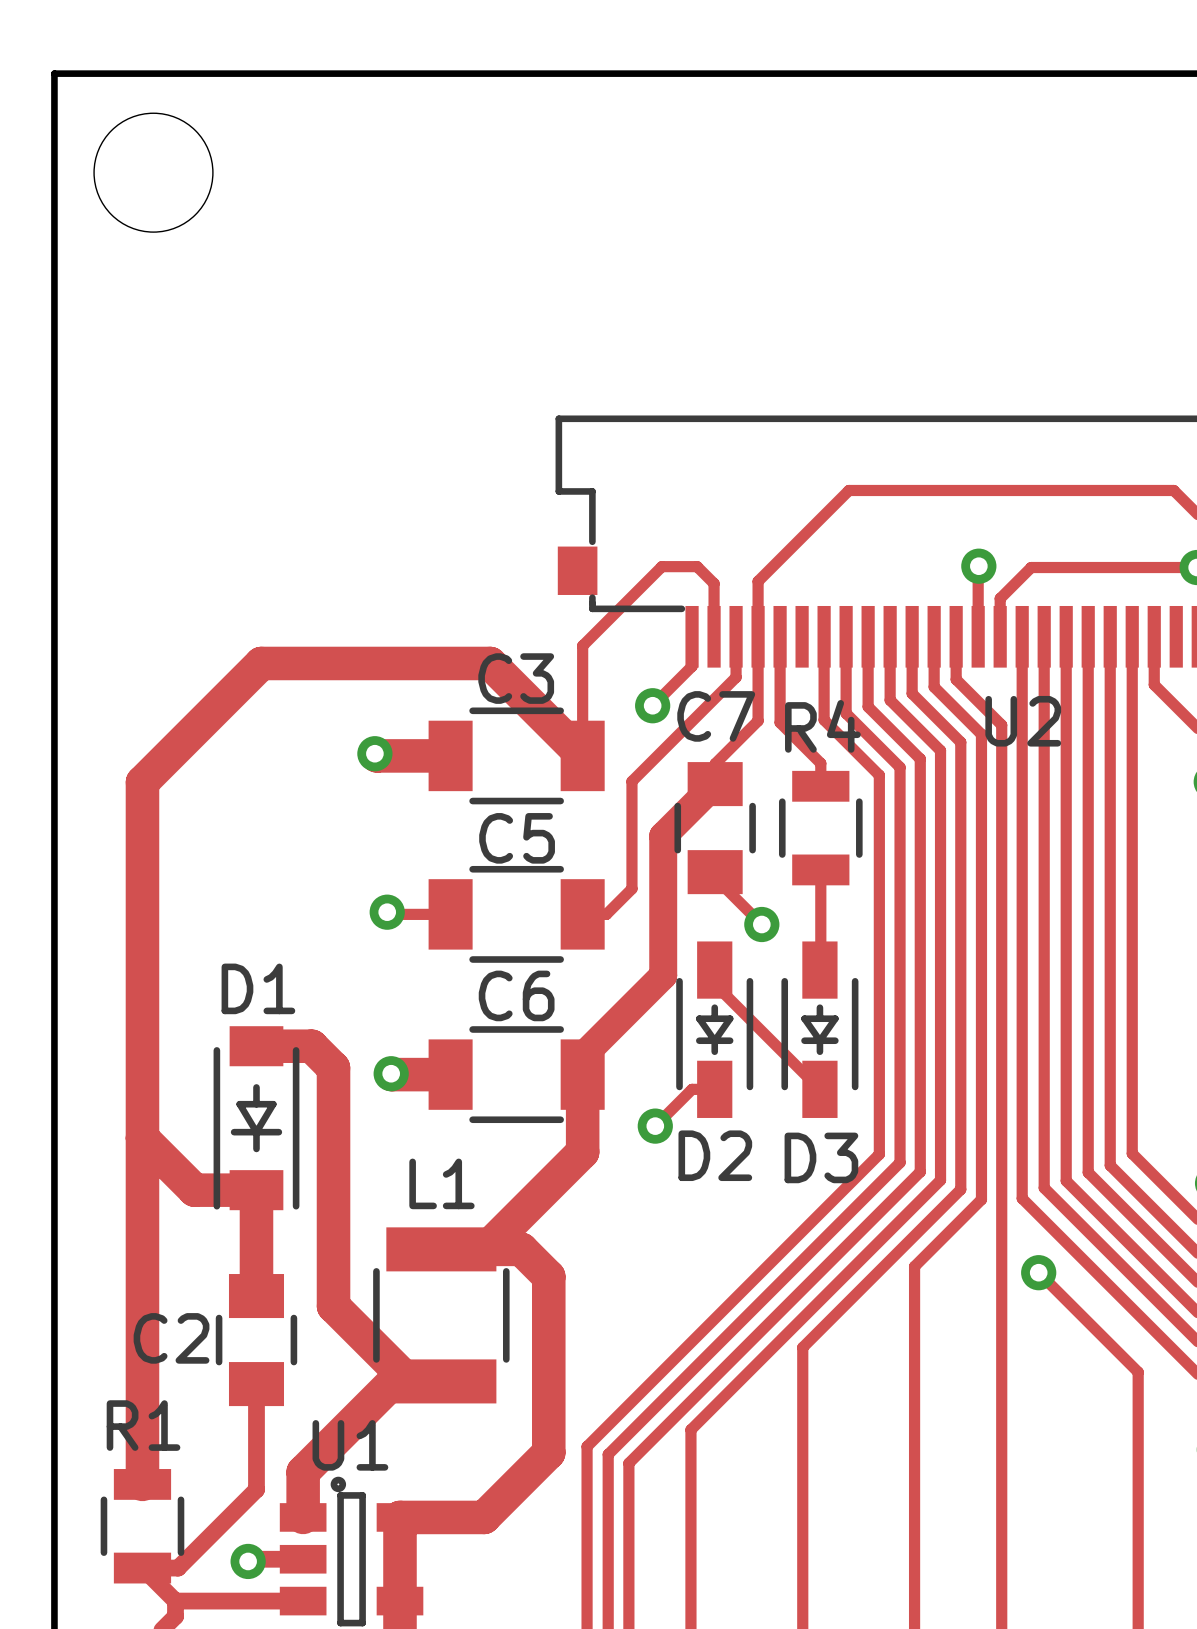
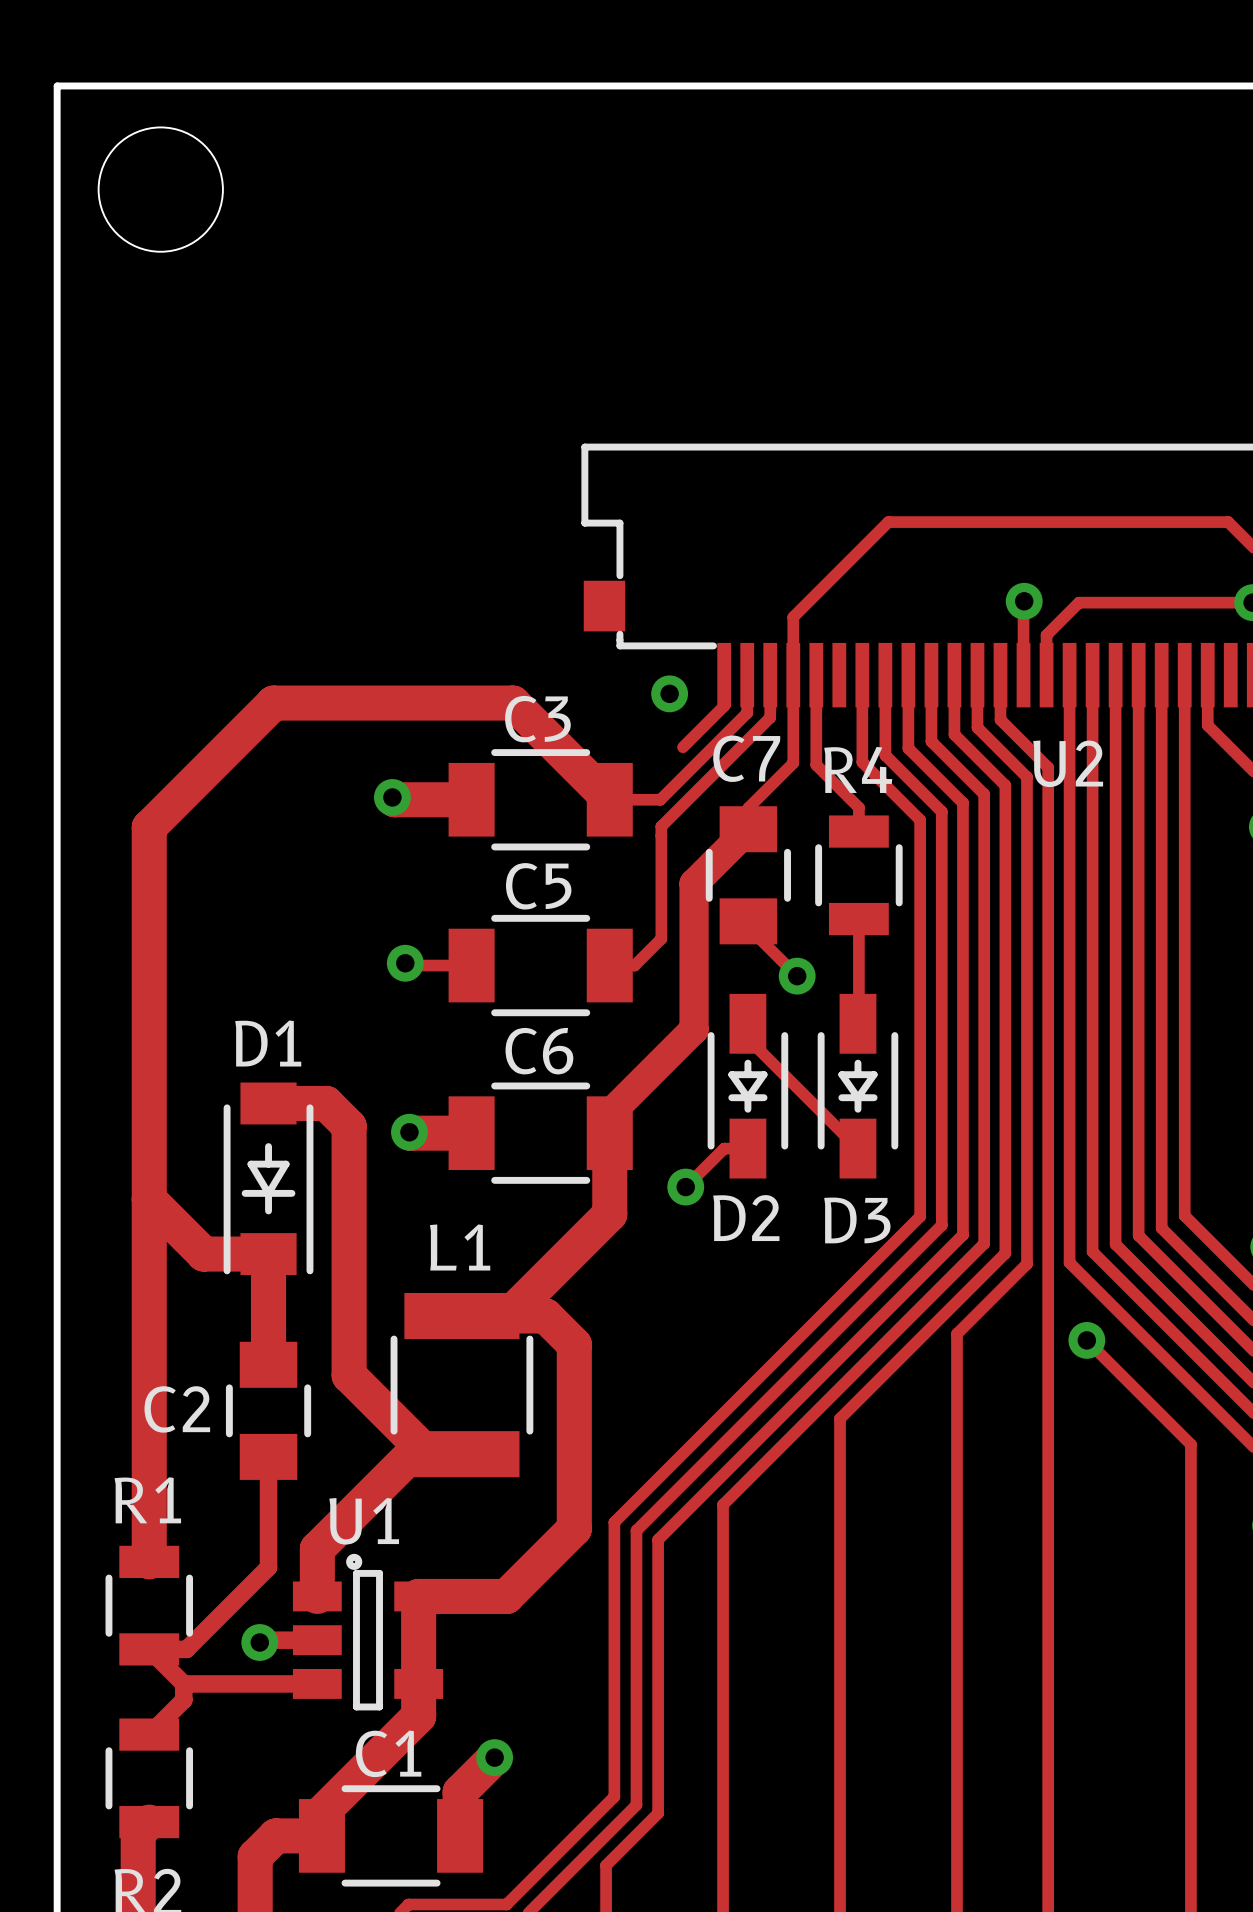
track: (714, 636) (714, 583) (697, 566) (661, 566) (582, 645) (582, 755) -> (747, 675) (747, 712) (660, 799) (609, 799)
via position: (652, 705) -> (669, 693)

